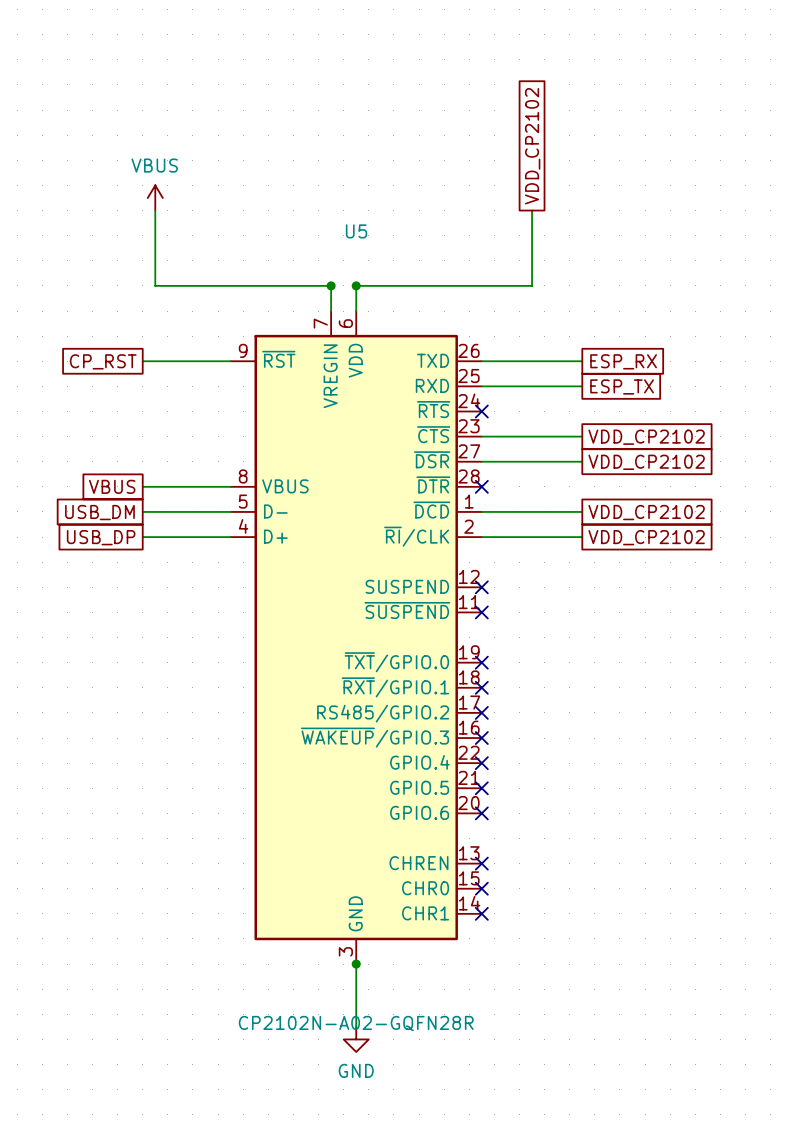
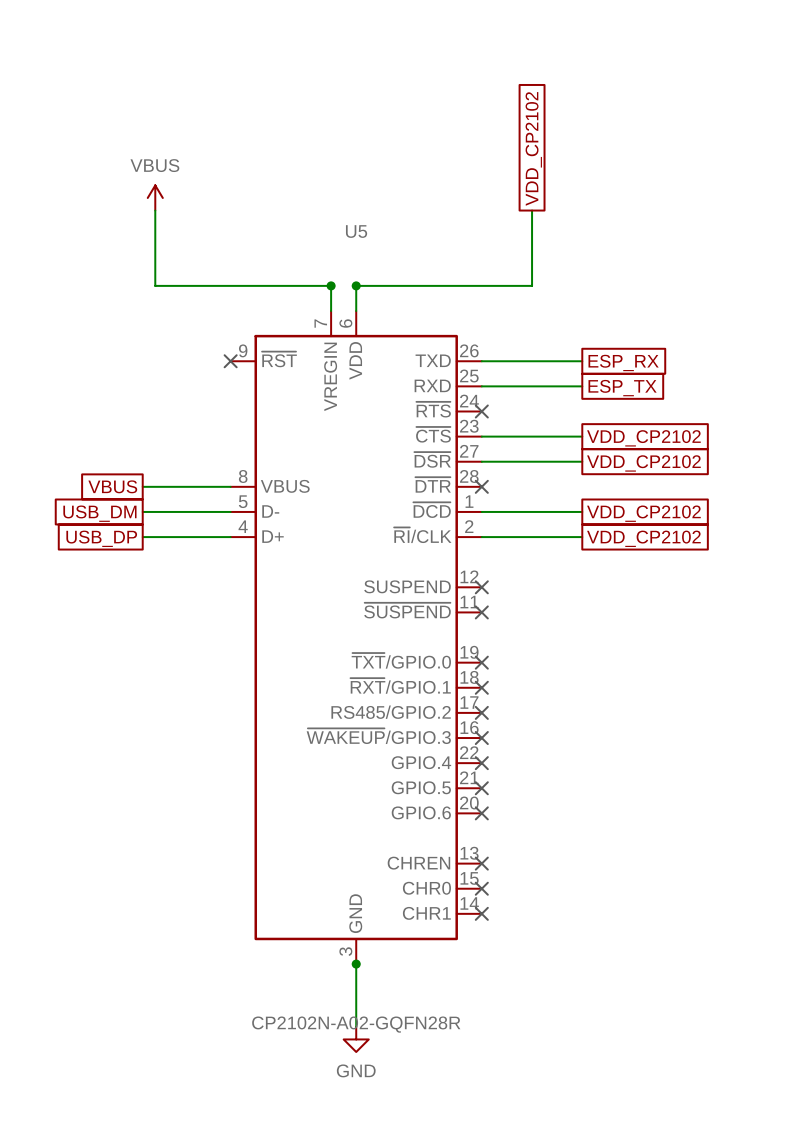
global label: CP_RST (103, 361) -> none
wire: (142, 361) (230, 361) -> none
no-connect mark: none -> (230, 361)

